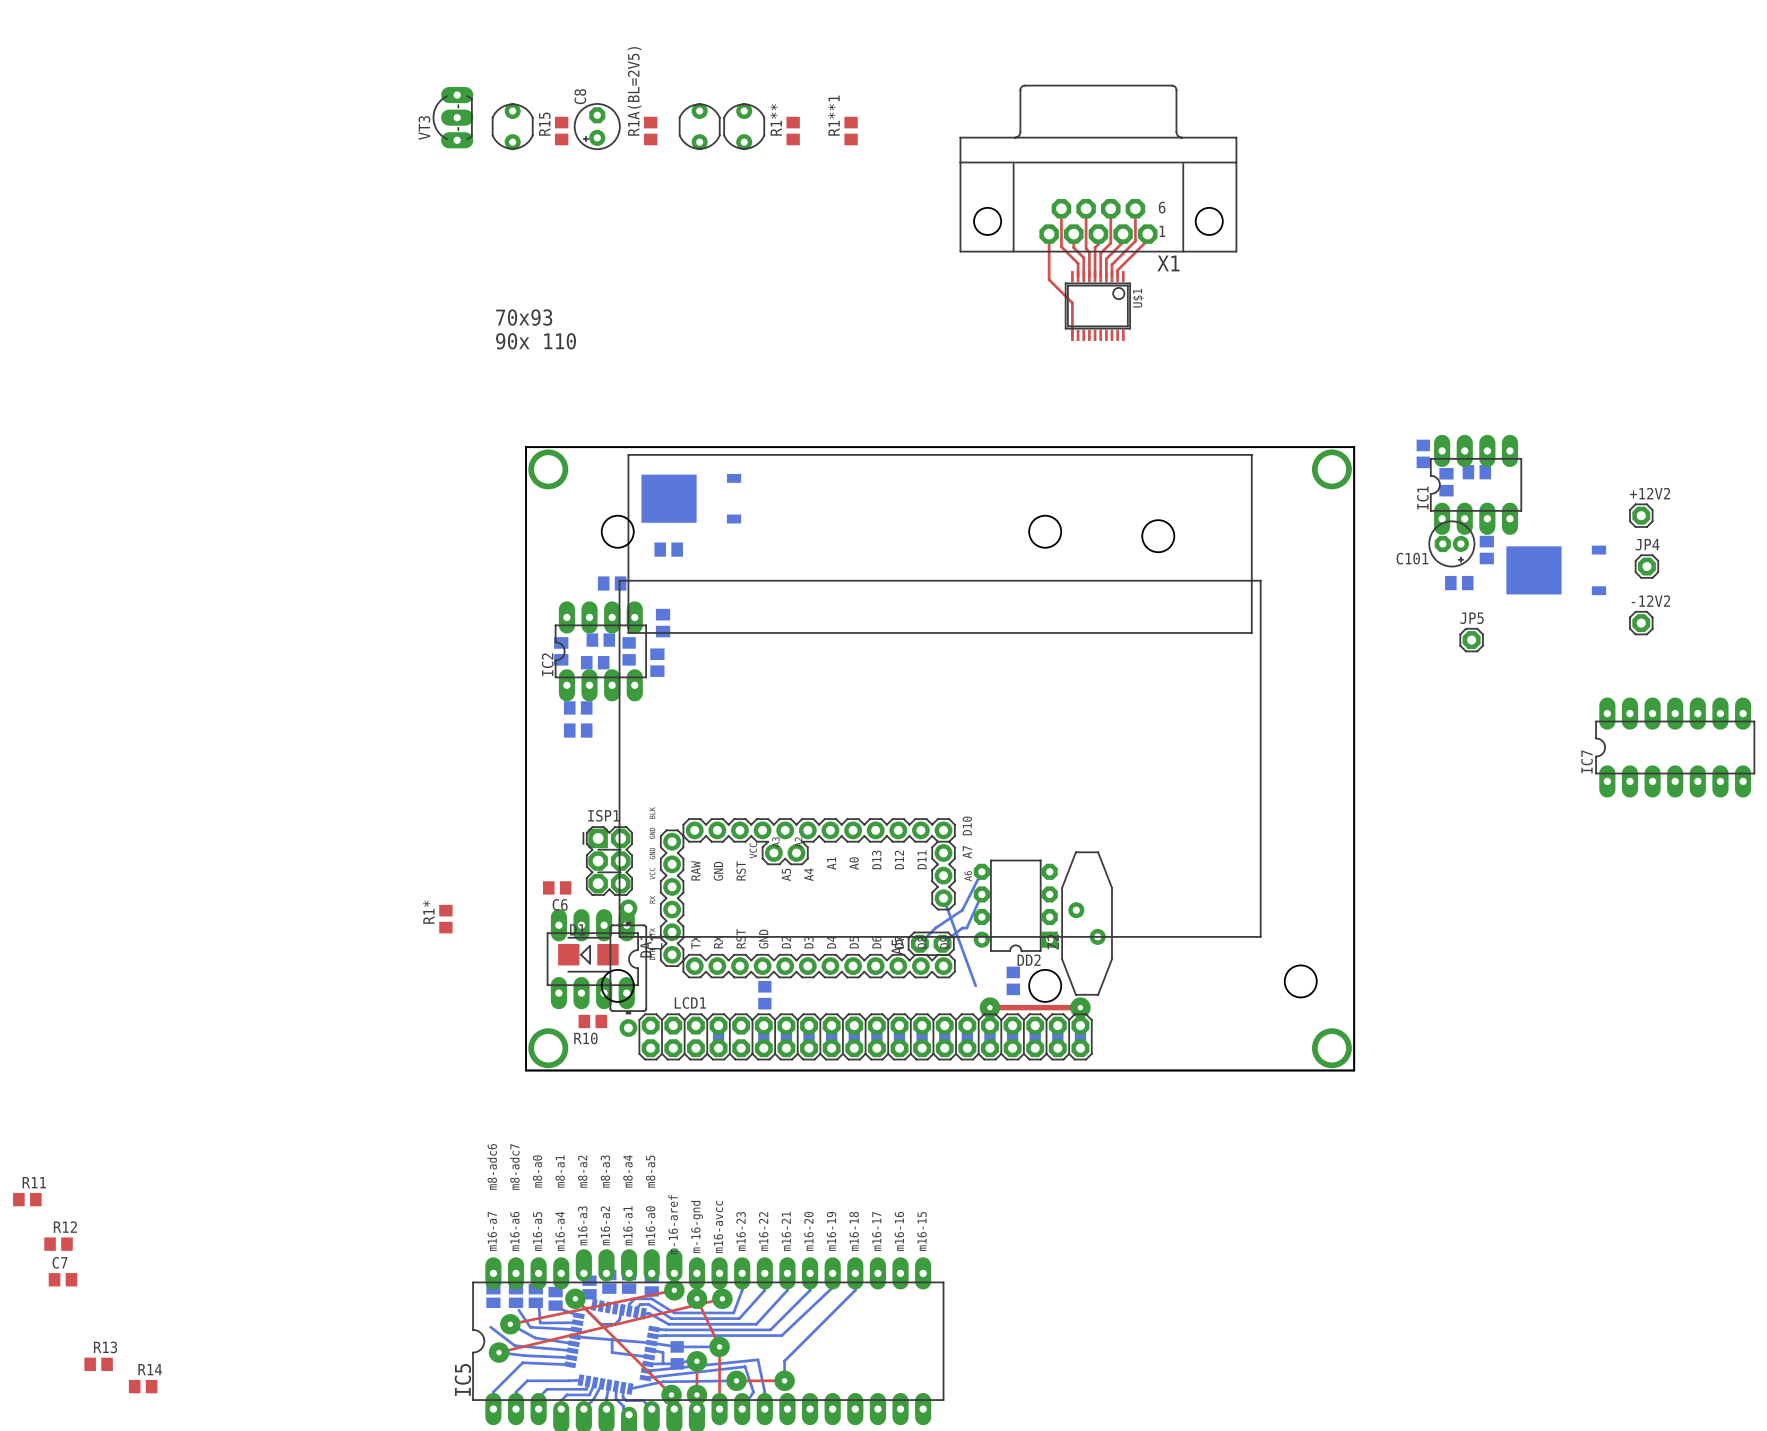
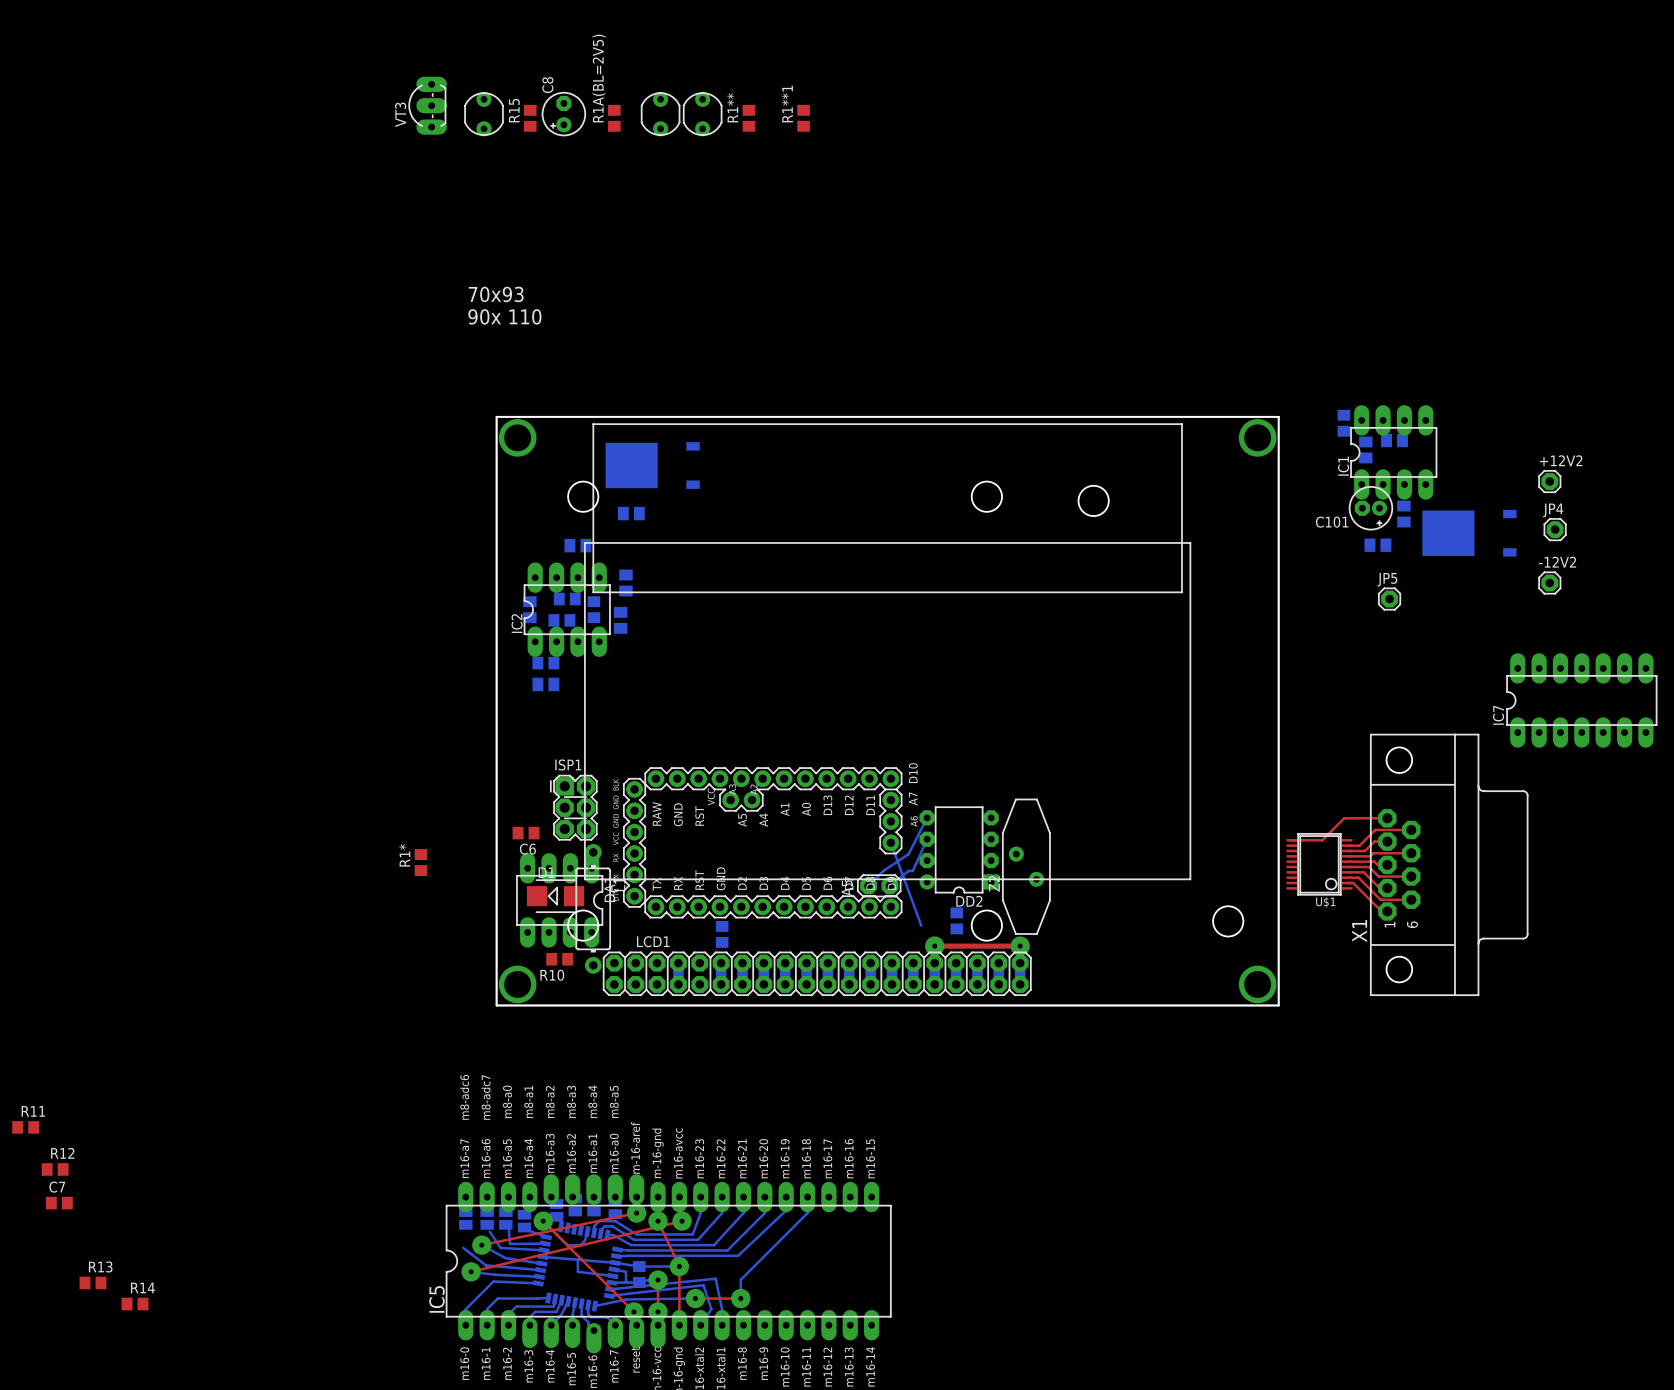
X1 footprint: [959, 84, 1238, 253] -> [1370, 733, 1529, 996]
top track: (1061, 208) (1061, 246) (1078, 263) (1078, 276) -> none
top track: (1086, 208) (1086, 248) (1089, 252) (1089, 276) -> none
top track: (1110, 208) (1110, 243) (1100, 253) (1100, 276) -> none
top track: (1135, 208) (1135, 241) (1112, 264) (1112, 276) -> none
top track: (1049, 234) (1049, 279) (1072, 303) (1072, 335) -> none
top track: (1073, 234) (1073, 247) (1083, 257) (1083, 276) -> none
top track: (1098, 234) (1098, 244) (1095, 247) (1095, 276) -> none
top track: (1123, 234) (1123, 242) (1106, 258) (1106, 276) -> none
top track: (1147, 234) (1147, 240) (1117, 270) (1117, 276) -> none
X1 name position: X1 (1168, 263) -> X1 (1359, 931)
U$1 rotation: 0° (1097, 305) -> 90° clockwise (1319, 864)
U$1 position: (1097, 305) -> (1319, 864)
top track: none -> (1387, 818) (1344, 818) (1322, 840) (1291, 840)
top track: none -> (1411, 829) (1375, 829) (1359, 845) (1347, 845)
top track: none -> (1387, 841) (1374, 841) (1364, 850) (1347, 850)
top track: none -> (1411, 853) (1373, 853) (1370, 856) (1347, 856)
top track: none -> (1347, 861) (1374, 861) (1377, 864) (1387, 864)
top track: none -> (1347, 867) (1369, 867) (1378, 876) (1411, 876)
top track: none -> (1347, 872) (1363, 872) (1379, 888) (1387, 888)
top track: none -> (1347, 877) (1358, 877) (1380, 899) (1411, 899)
top track: none -> (1347, 883) (1353, 883) (1381, 911) (1387, 911)

